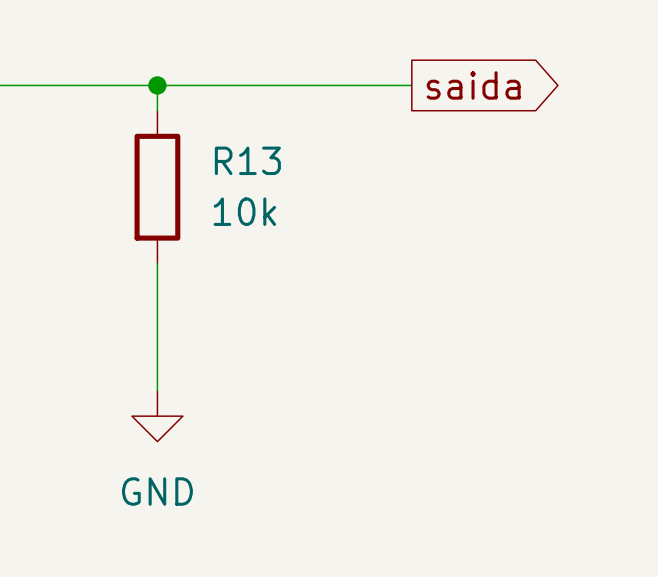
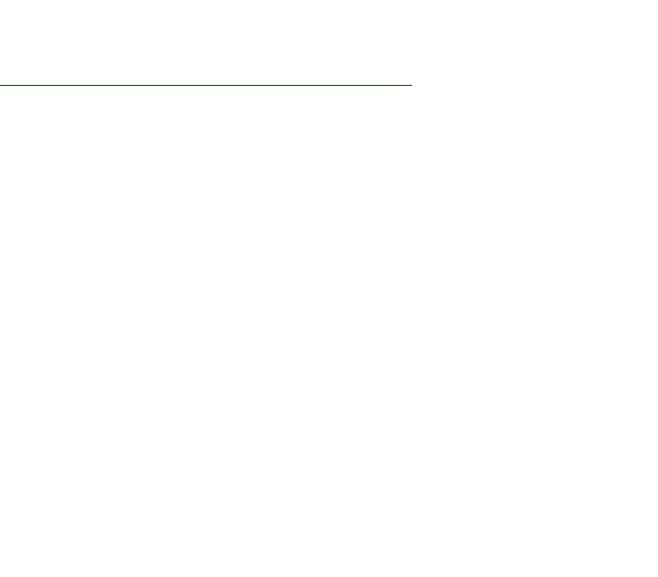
wire: (157, 85) (157, 110) -> none
junction: (157, 85) -> none
global label: saida (473, 85) -> none
R13: 10k (157, 187) -> none
wire: (157, 263) (157, 390) -> none
power symbol: GND (157, 416) -> none

